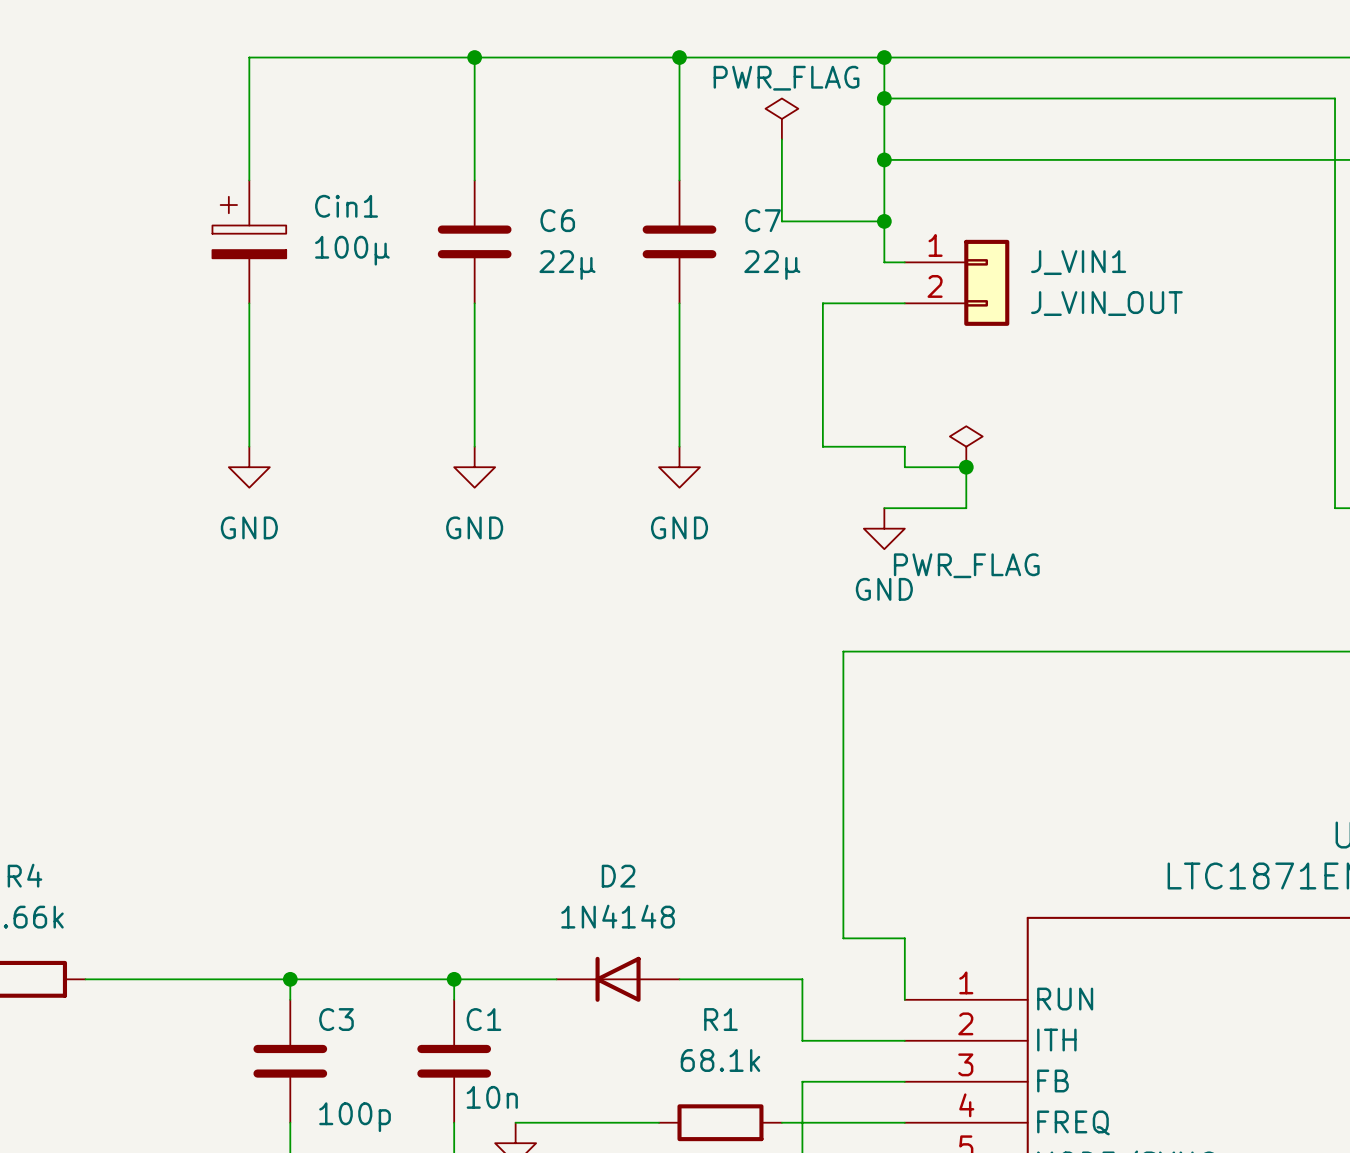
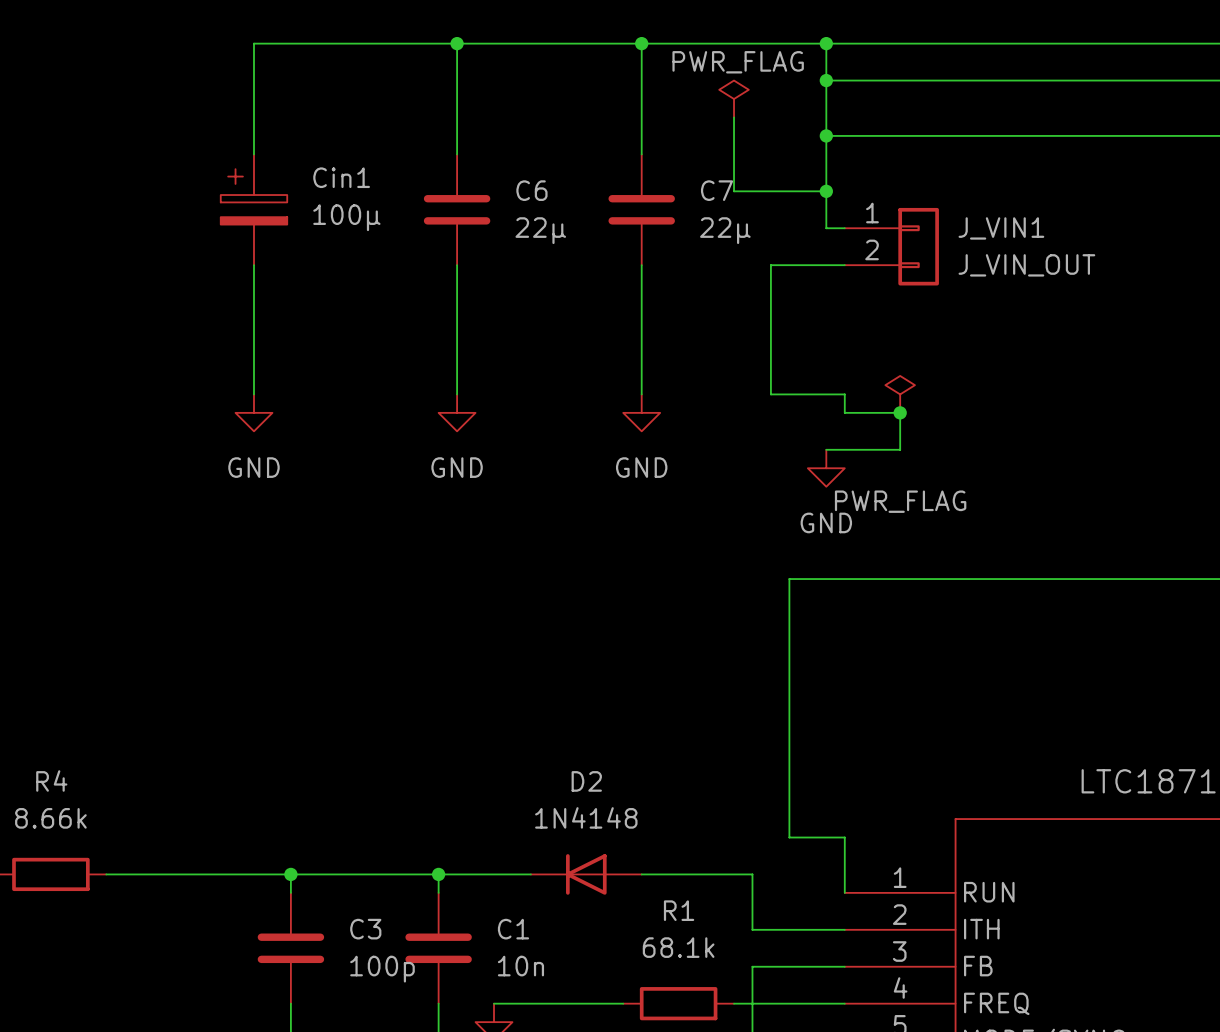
C3 name position: C3 (336, 1019) -> C3 (365, 929)
C1 name position: C1 (483, 1019) -> C1 (513, 929)
C1 value position: 10n (492, 1097) -> 10n (520, 966)
C3 value position: 100p (355, 1117) -> 100p (382, 969)

